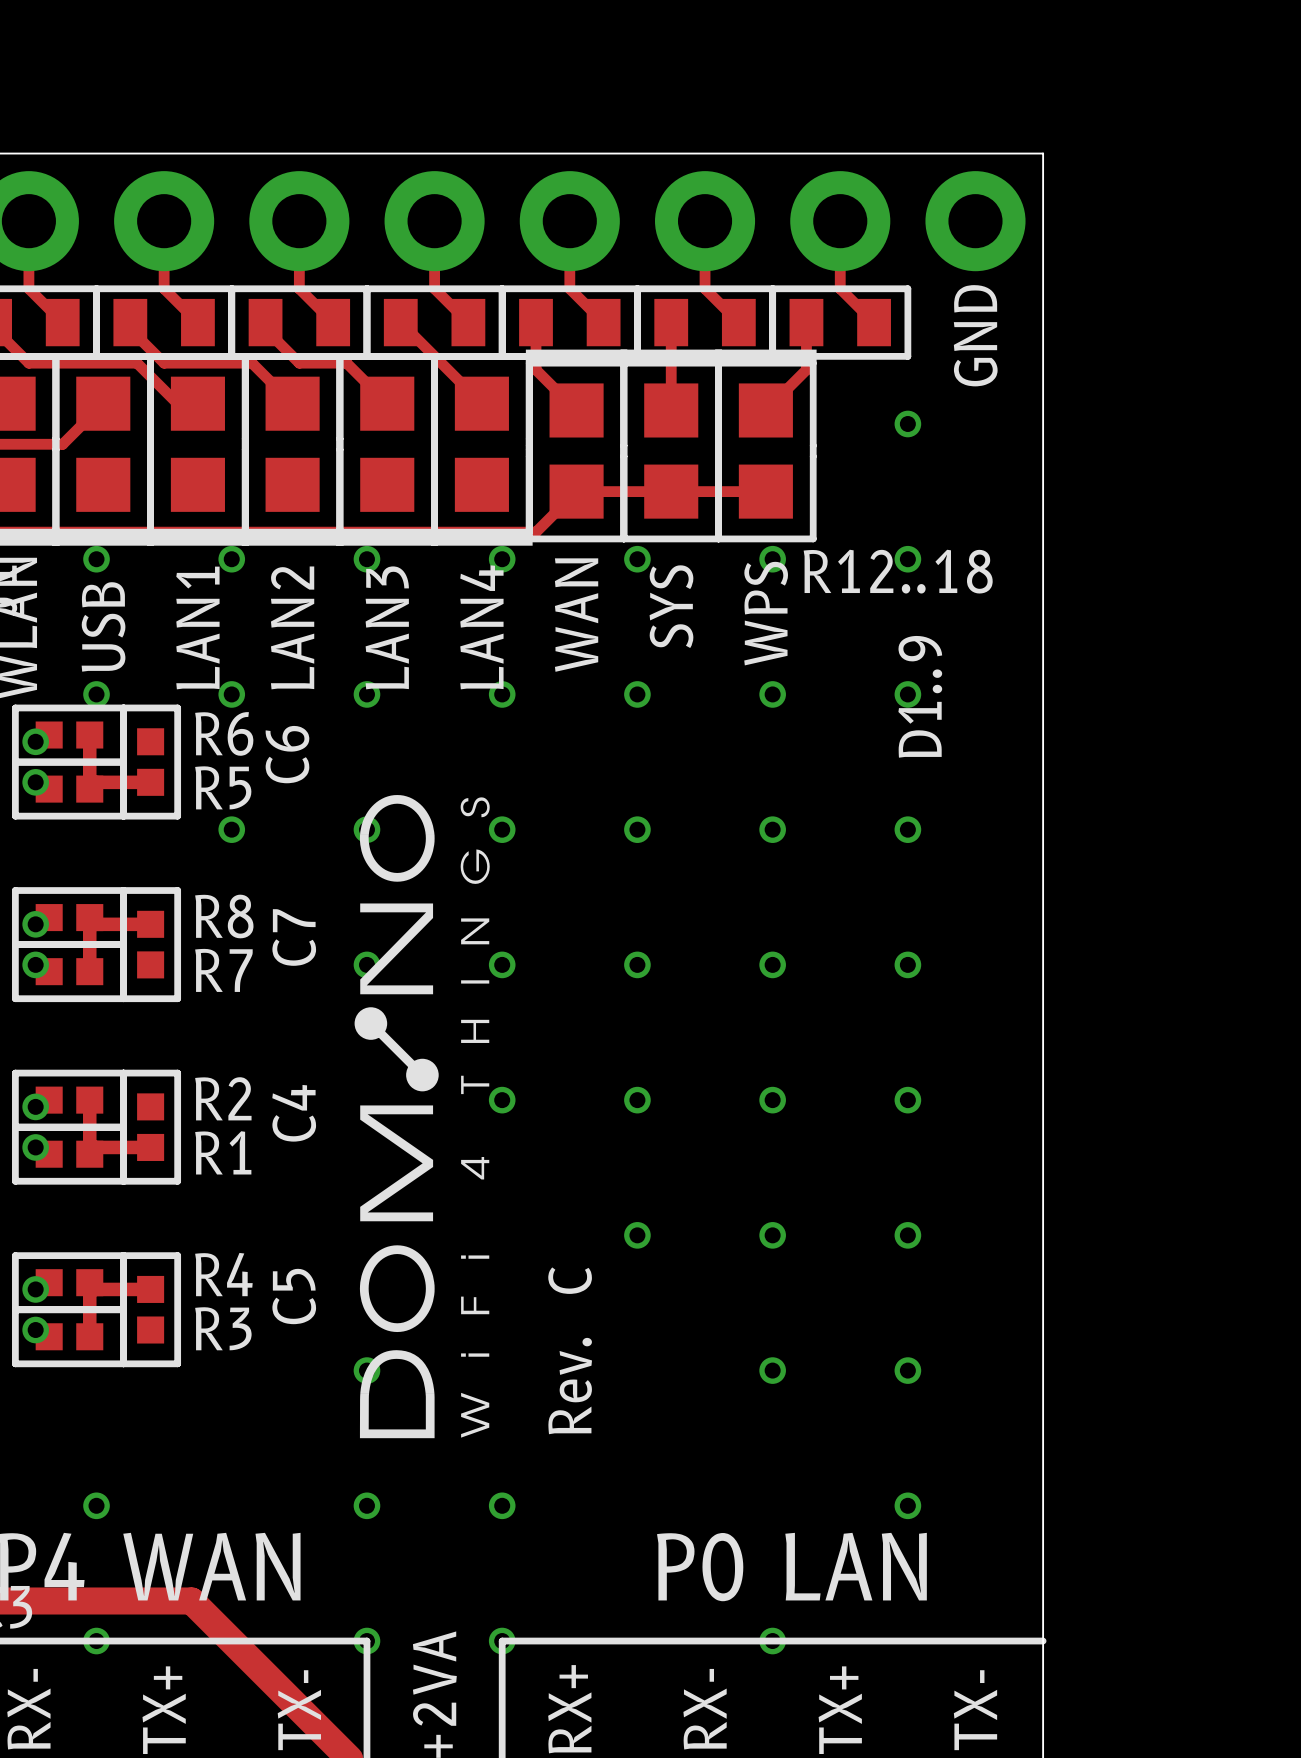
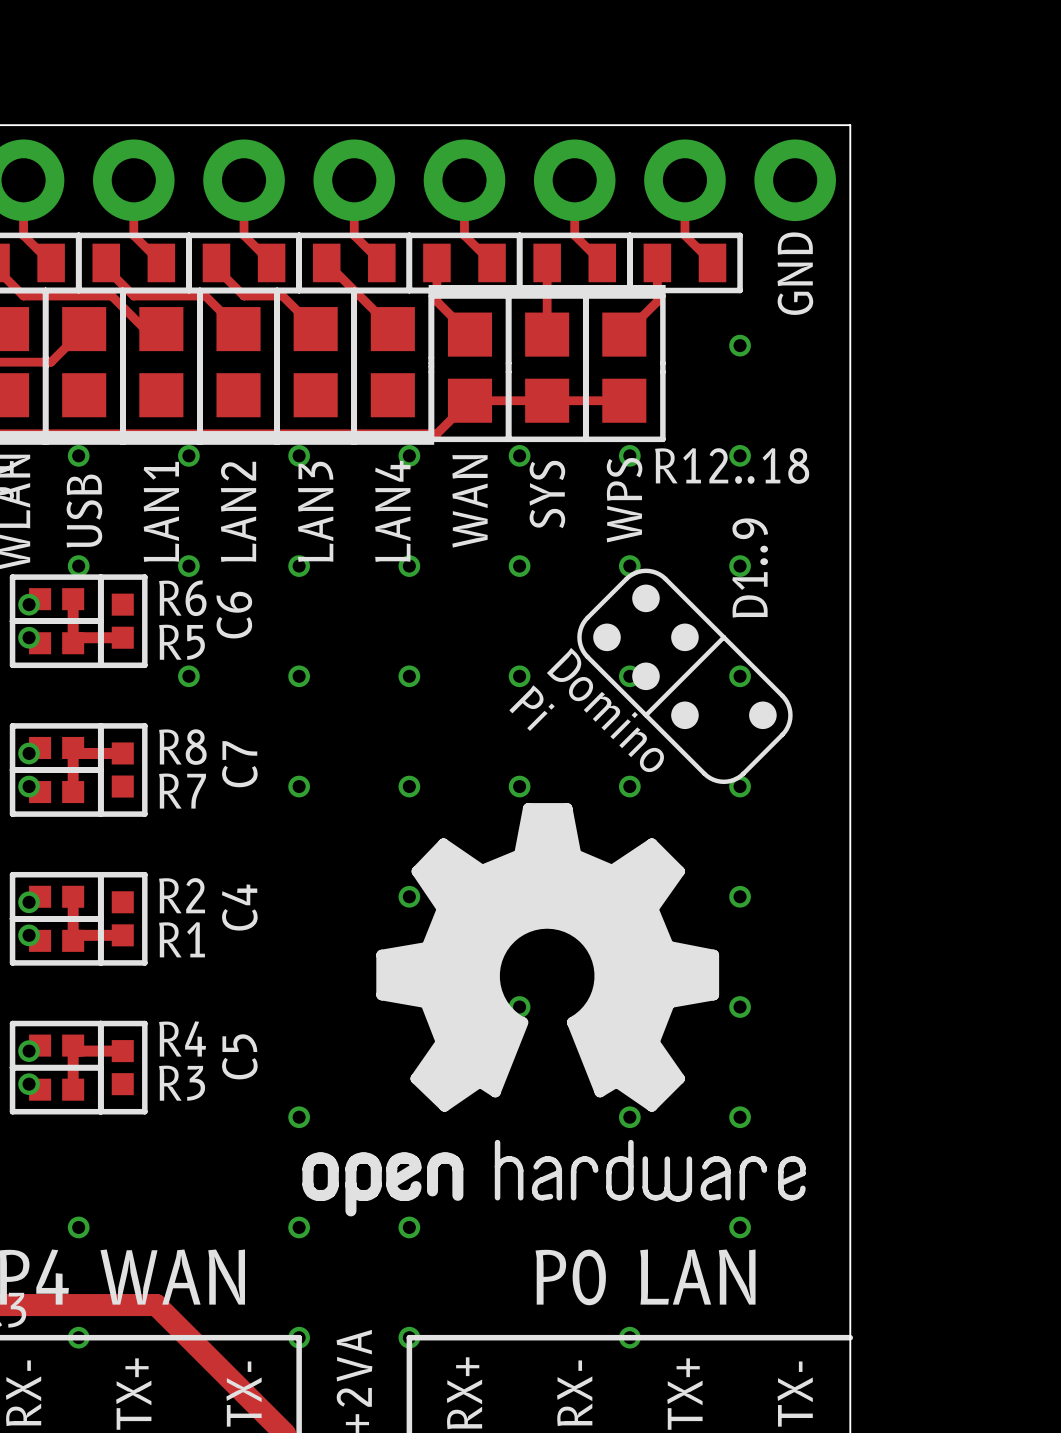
drawing: none -> [302, 568, 806, 1217]
drawing: [354, 795, 490, 1439] -> none
text: C (570, 1280) -> none
text: Rev. (570, 1386) -> none

